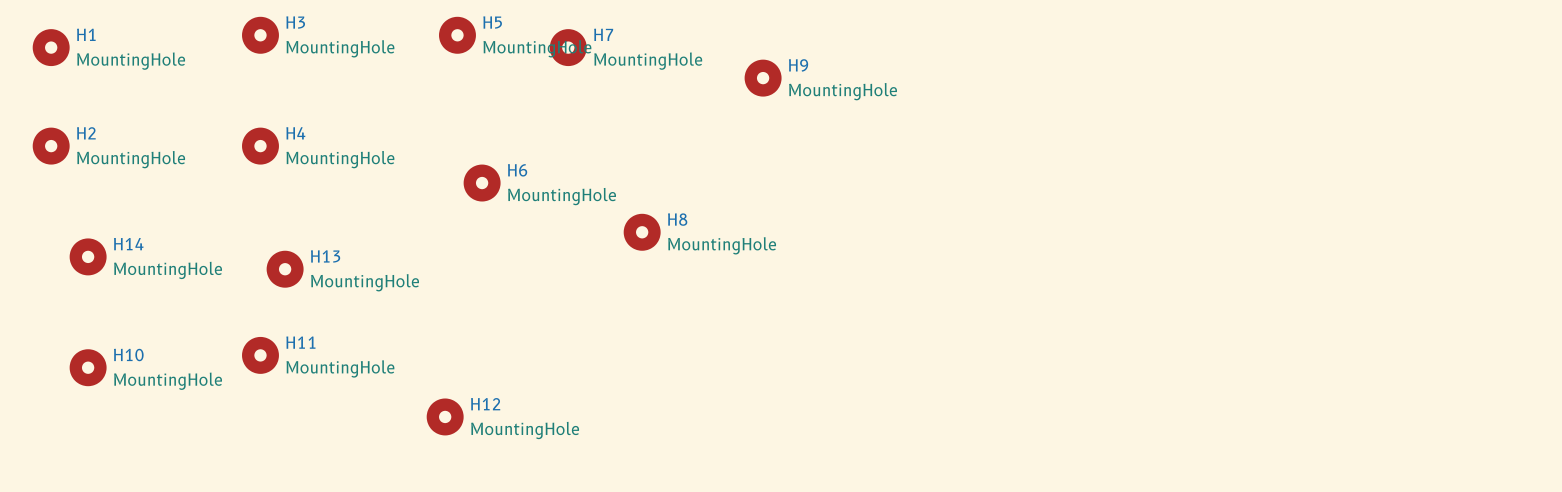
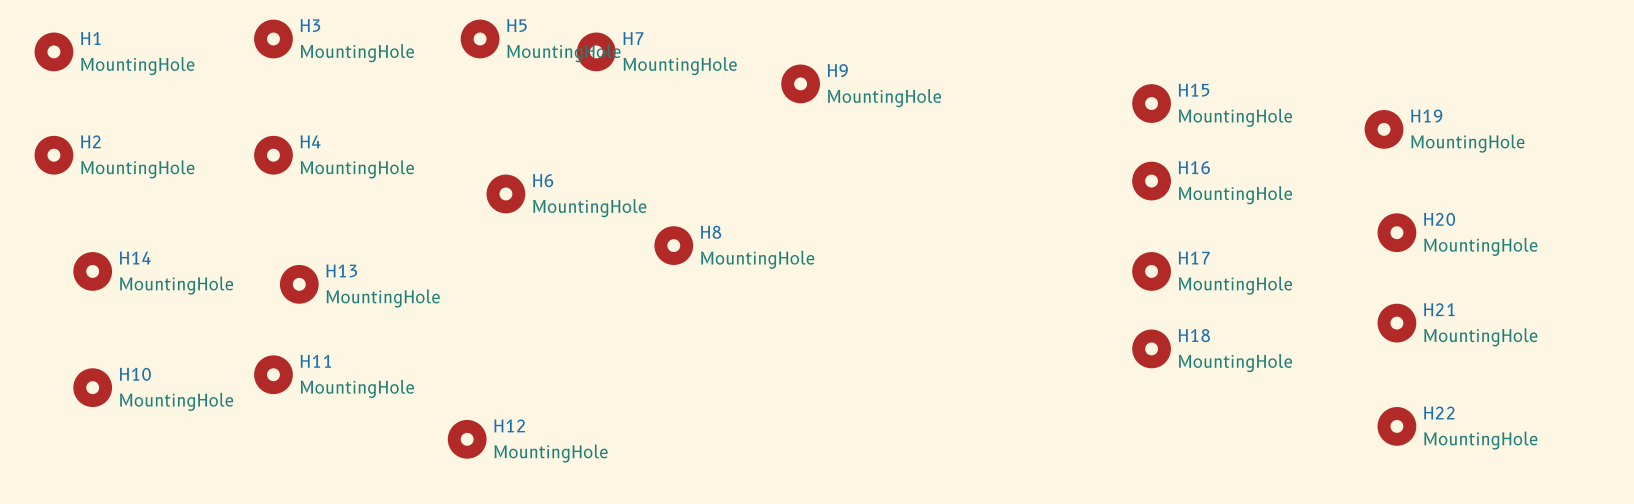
H15: none -> MountingHole (1151, 103)
H19: none -> MountingHole (1384, 129)
H16: none -> MountingHole (1151, 181)
H20: none -> MountingHole (1396, 232)
H17: none -> MountingHole (1151, 271)
H21: none -> MountingHole (1396, 323)
H18: none -> MountingHole (1151, 348)
H22: none -> MountingHole (1396, 426)

